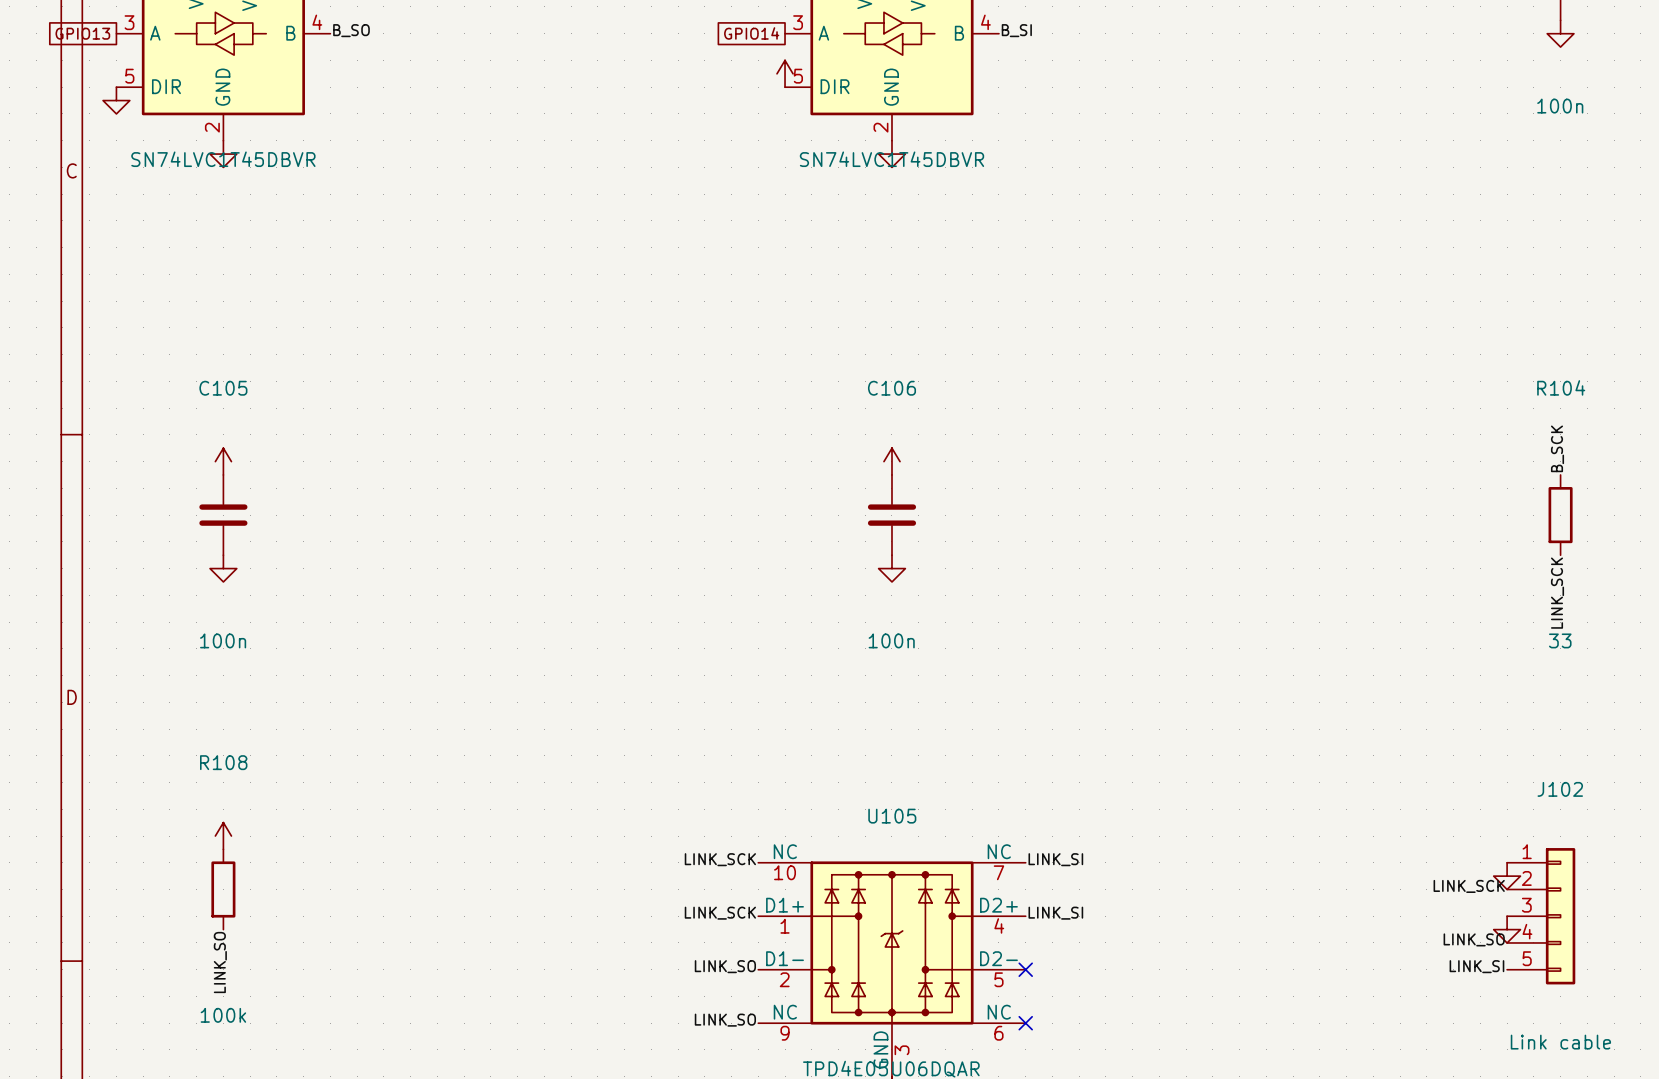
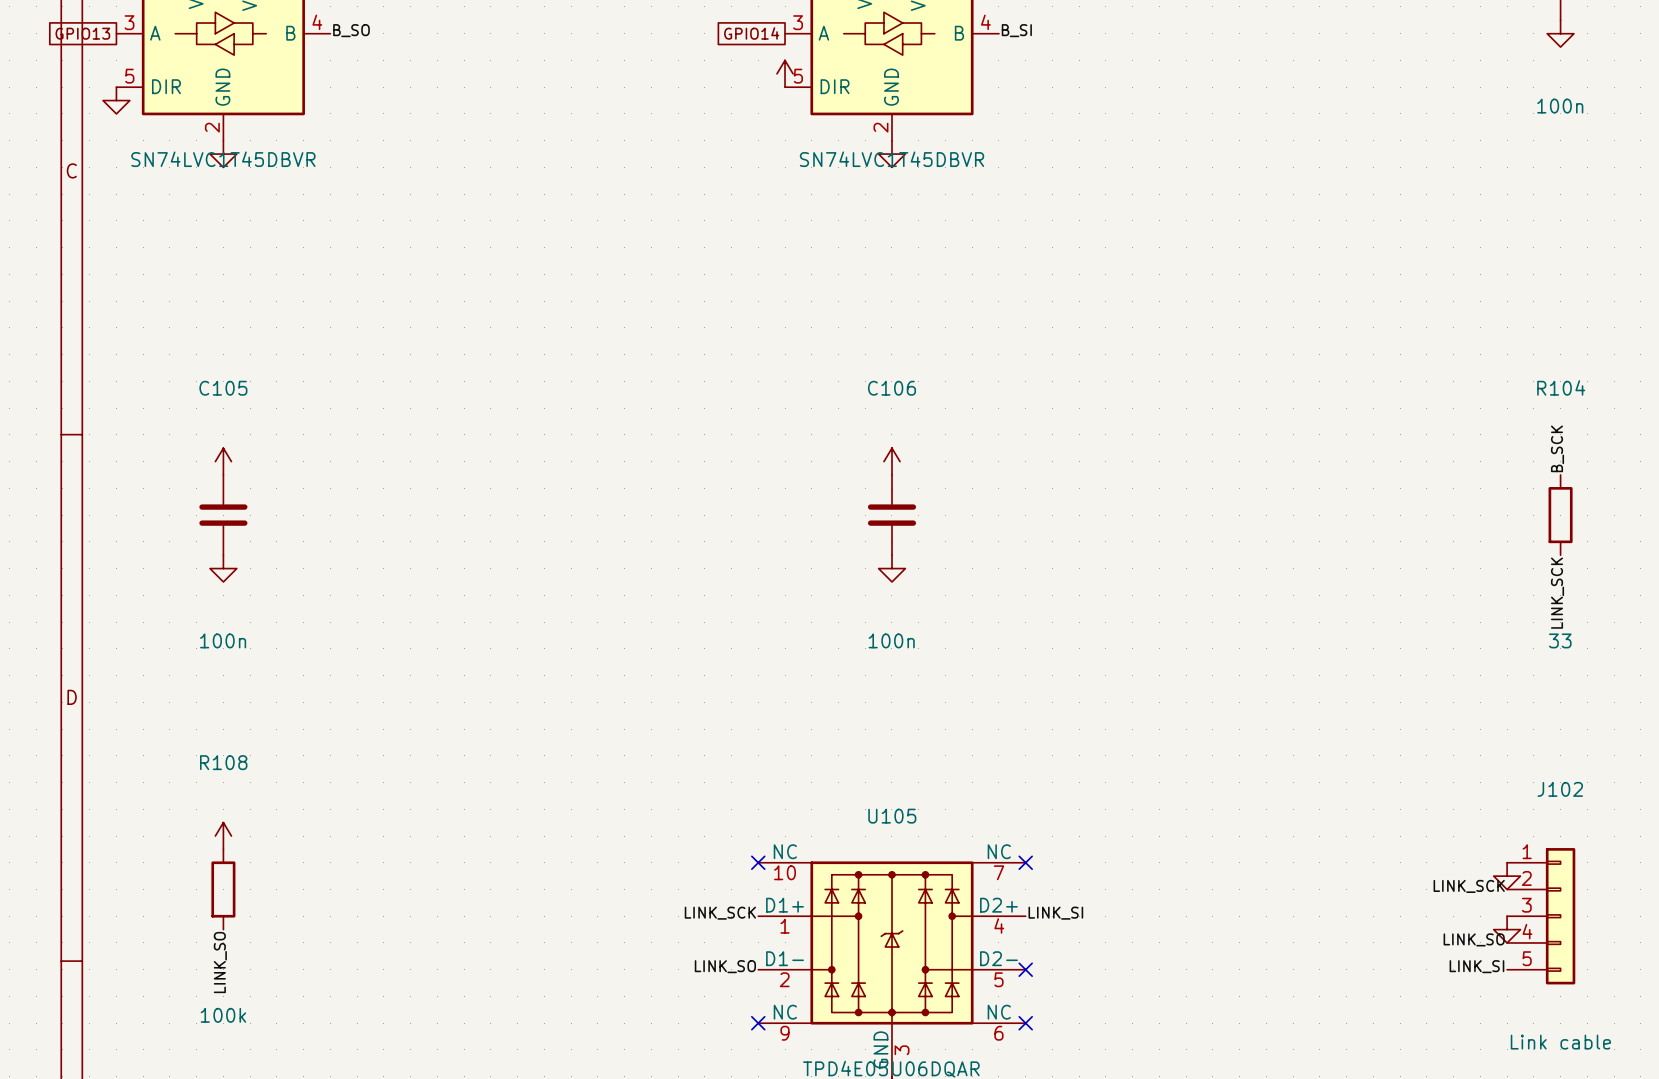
label: LINK_SCK (720, 859) -> none
label: LINK_SI (1055, 859) -> none
no-connect mark: none -> (758, 862)
no-connect mark: none -> (1025, 862)
label: LINK_SO (725, 1020) -> none
no-connect mark: none -> (758, 1023)

